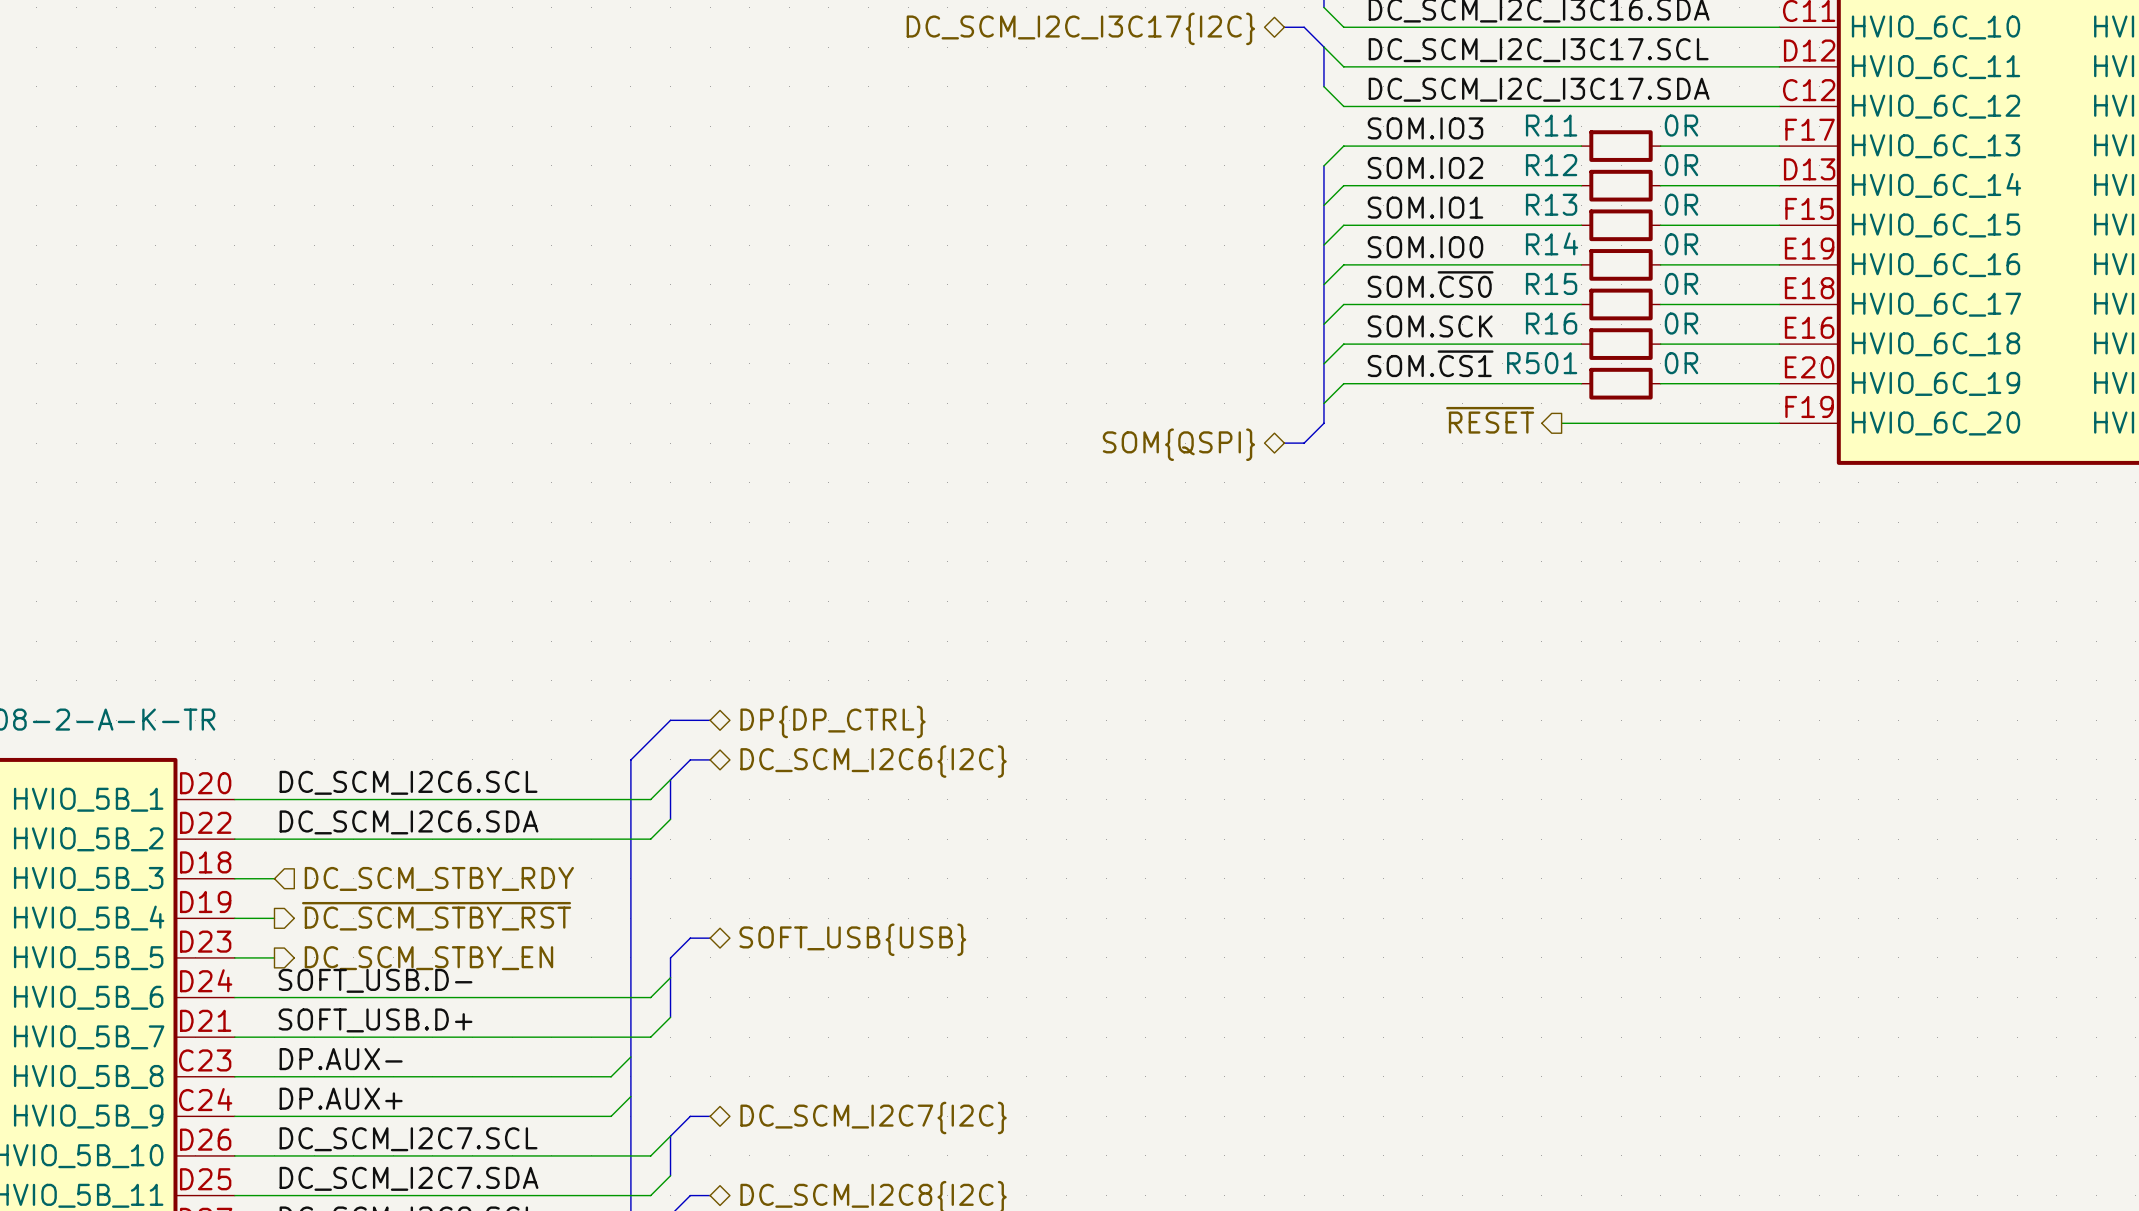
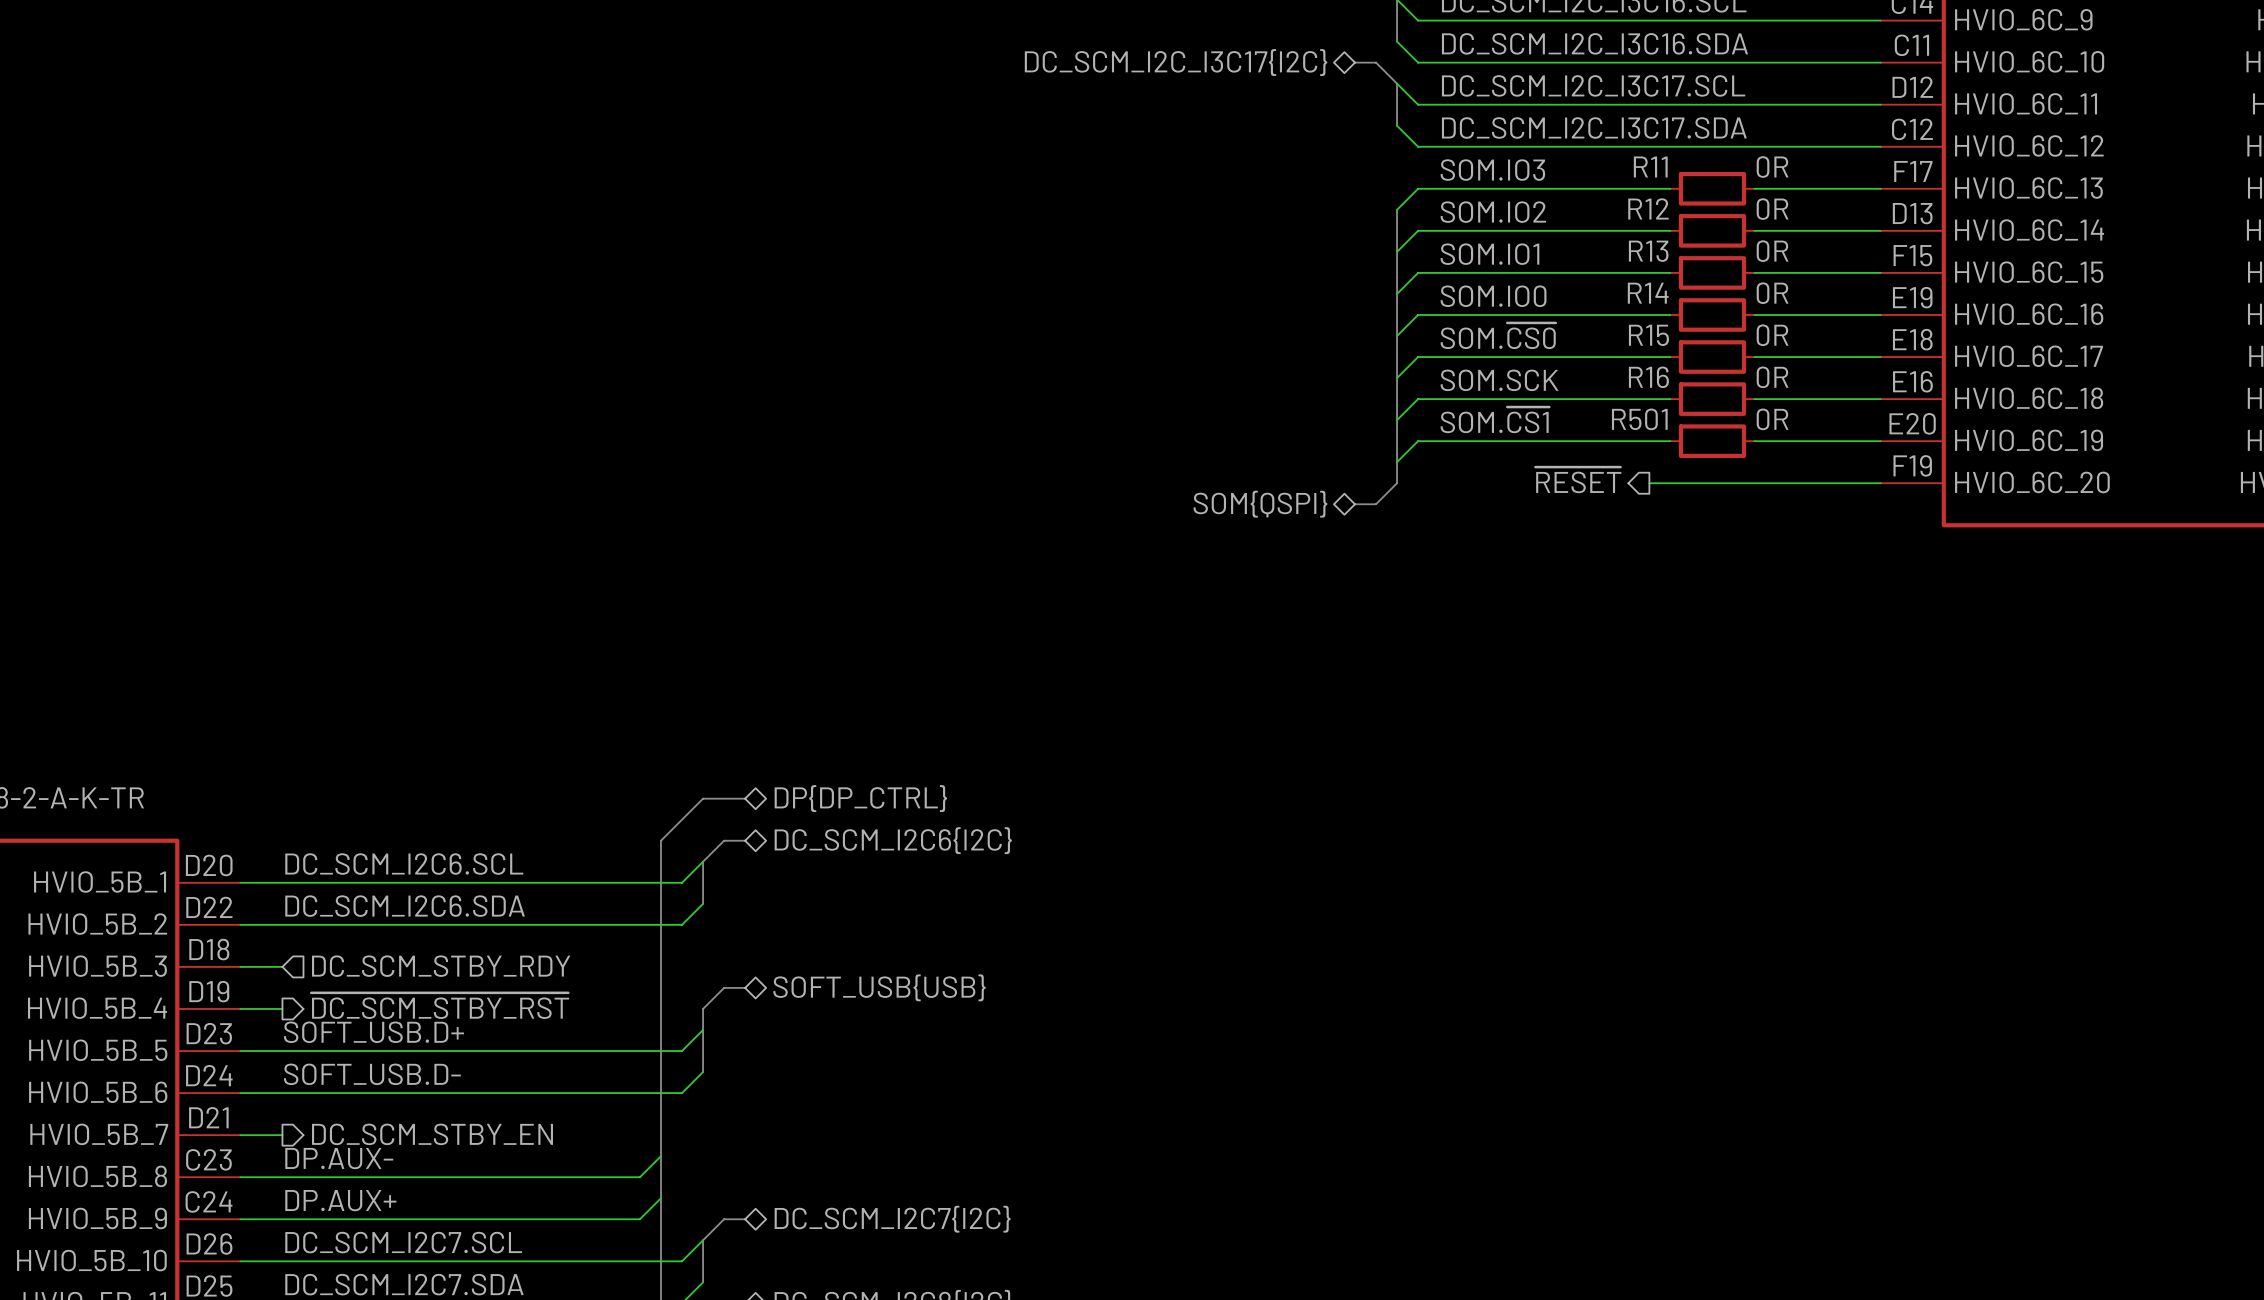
bus: (710, 938) (690, 938) (670, 957) -> (745, 987) (724, 987) (703, 1008) (703, 1051)
hierarchical label position: SOFT_USB{USB} (852, 939) -> SOFT_USB{USB} (879, 987)
hierarchical label position: DC_SCM_STBY_EN (428, 958) -> DC_SCM_STBY_EN (432, 1134)
bus: (670, 977) (670, 1017) -> none
wire: (670, 1017) (650, 1037) (274, 1037) -> (703, 1030) (682, 1051) (282, 1051)
label position: SOFT_USB.D+ (375, 1020) -> SOFT_USB.D+ (374, 1032)

